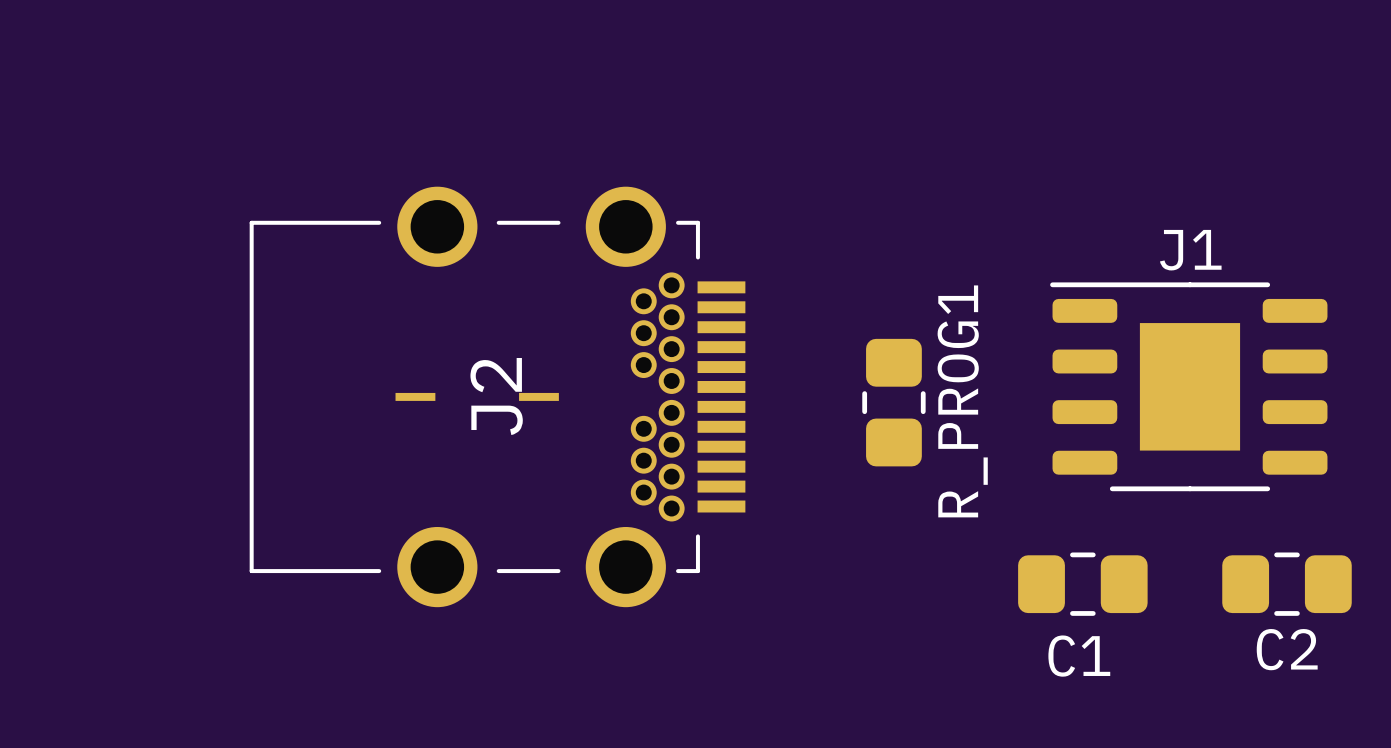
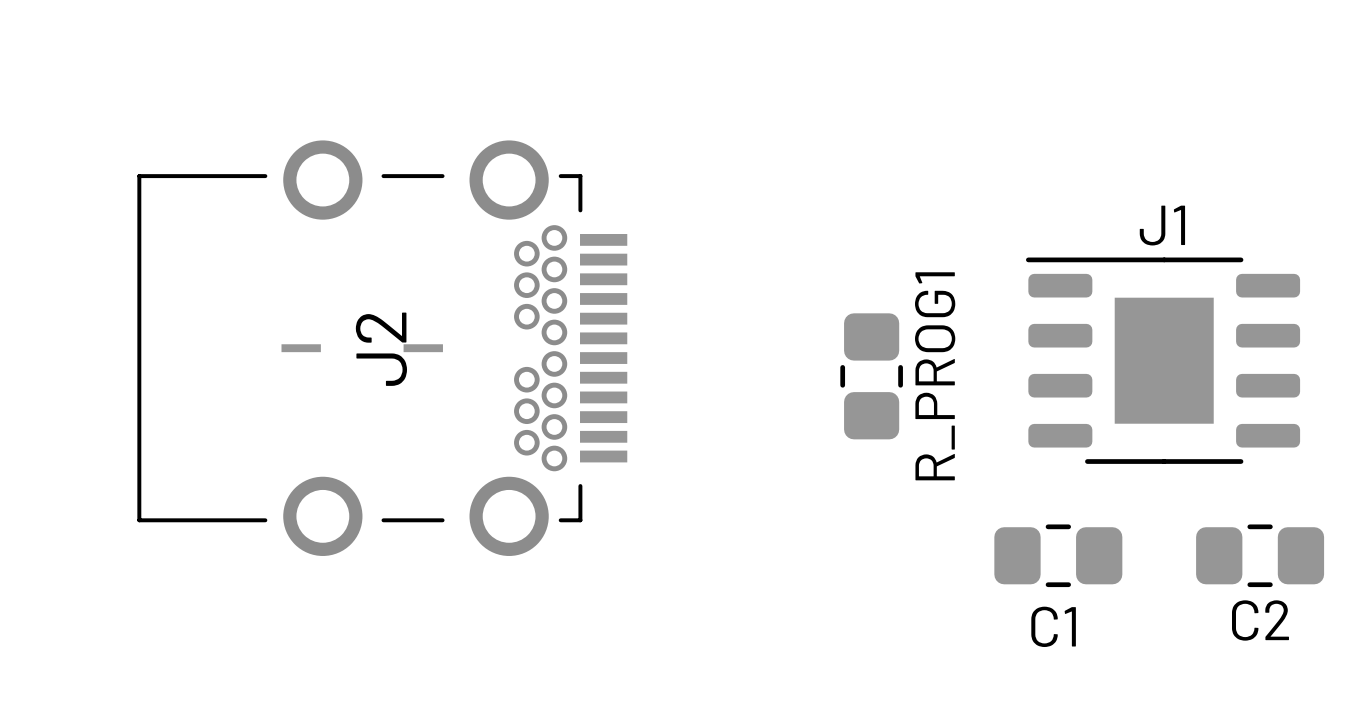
J2 position: (497, 396) -> (382, 348)

